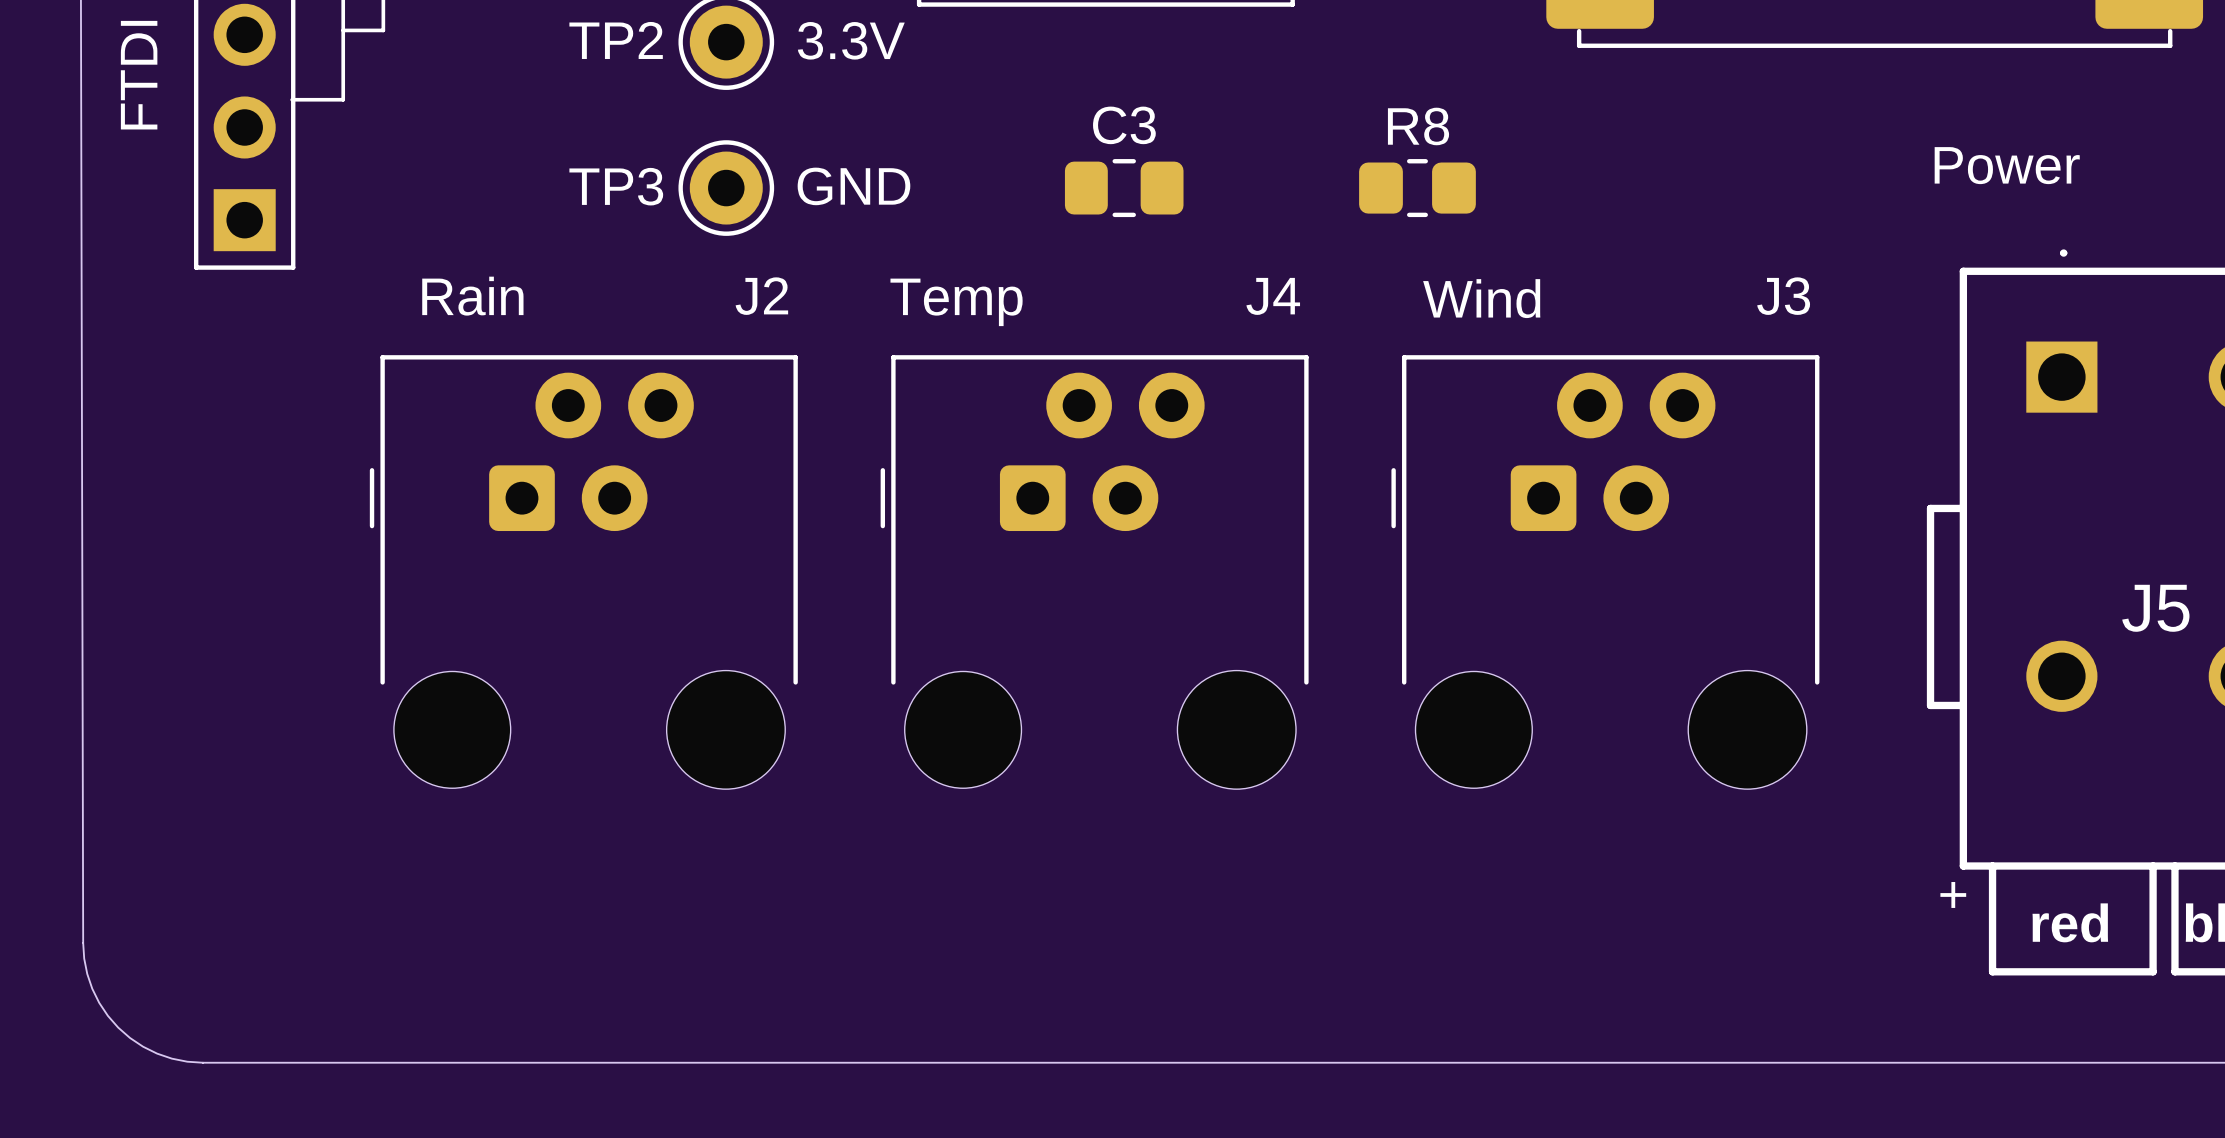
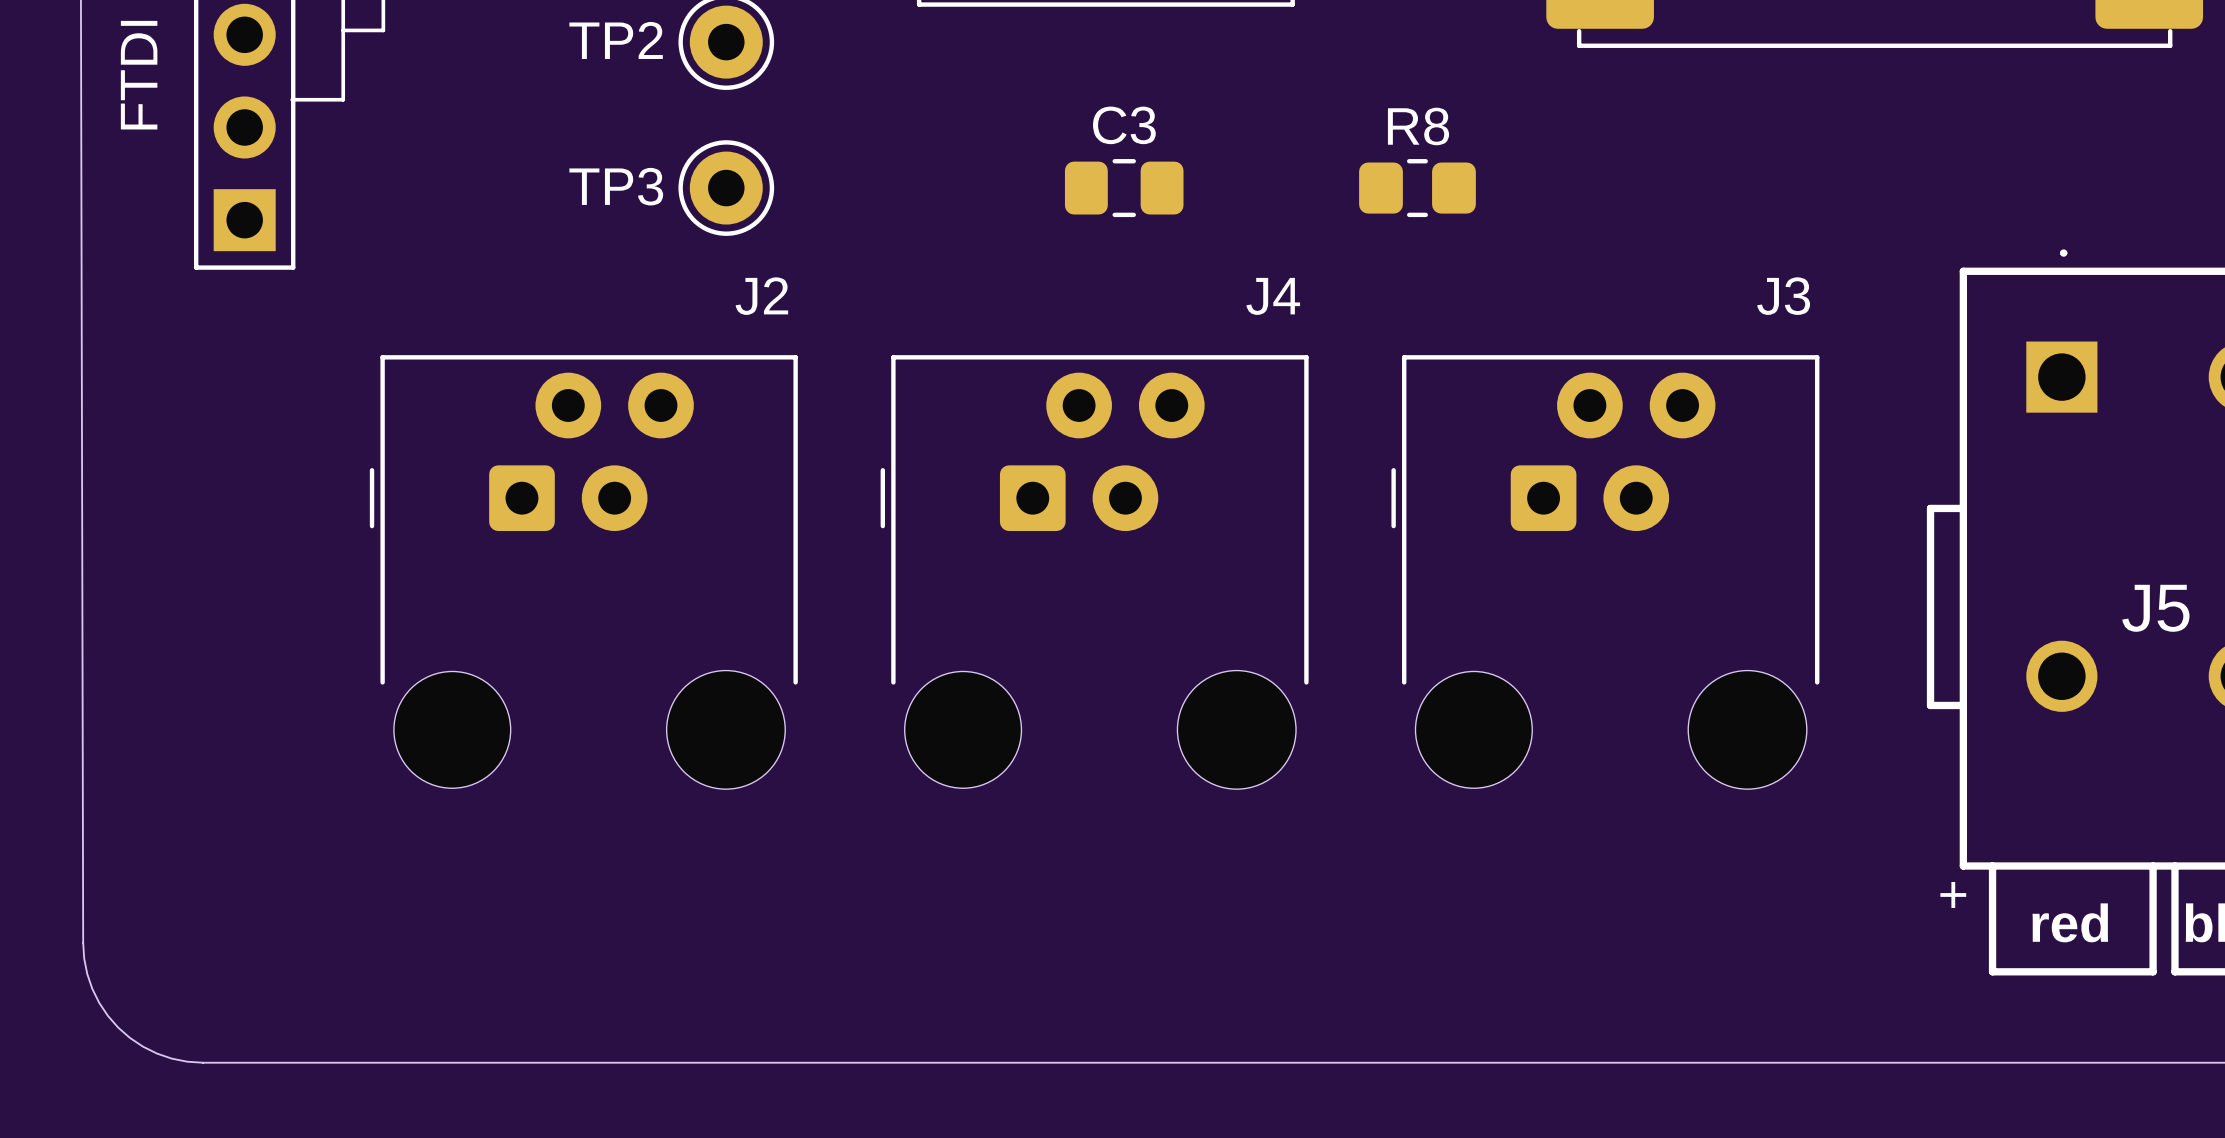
text: 3.3V (851, 40) -> none
text: Power (2007, 165) -> none
text: GND (853, 186) -> none
text: Rain (472, 296) -> none
text: Wind (1481, 298) -> none
text: Temp (956, 302) -> none

